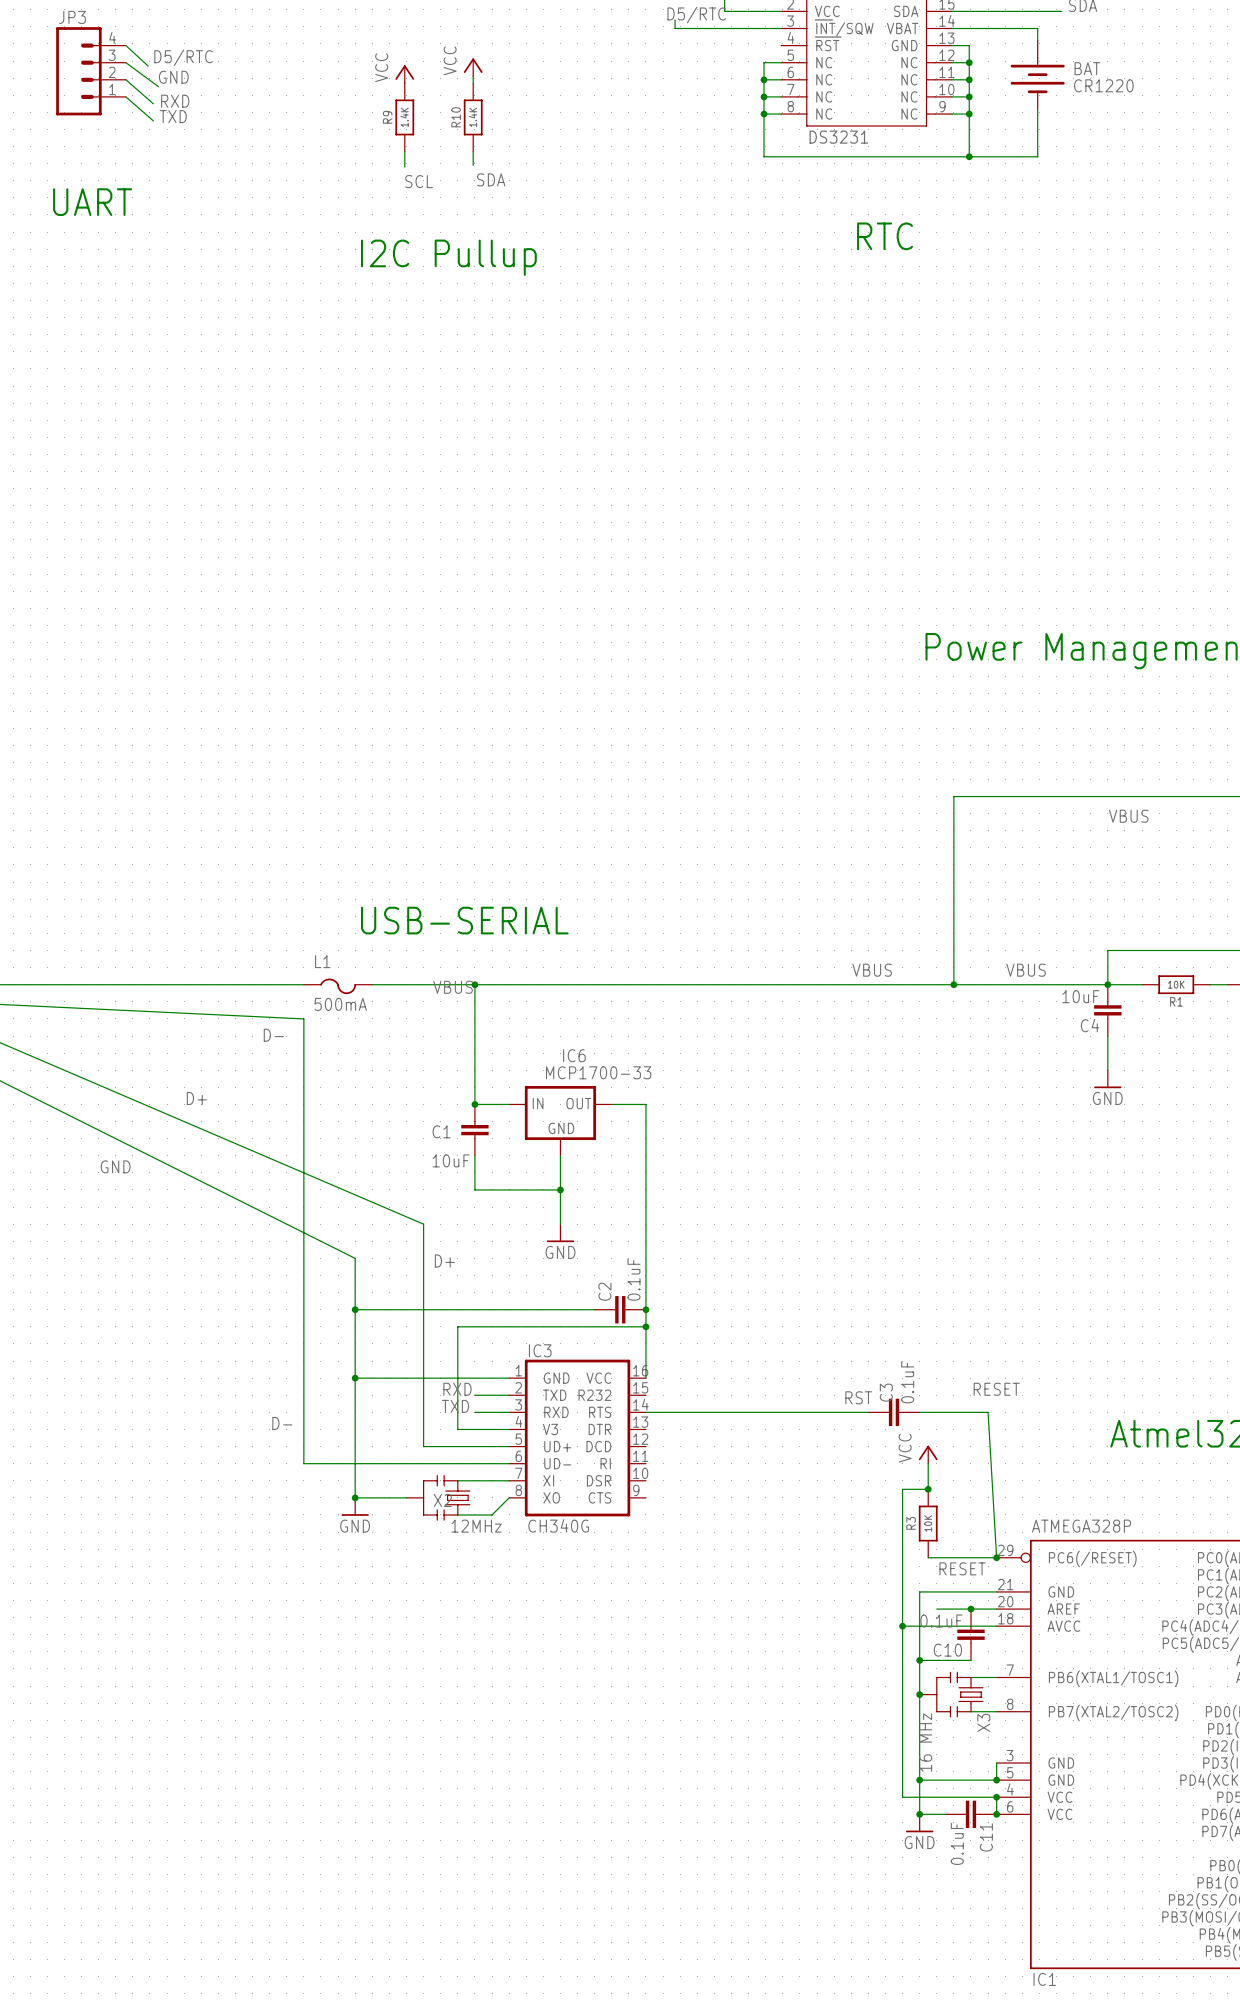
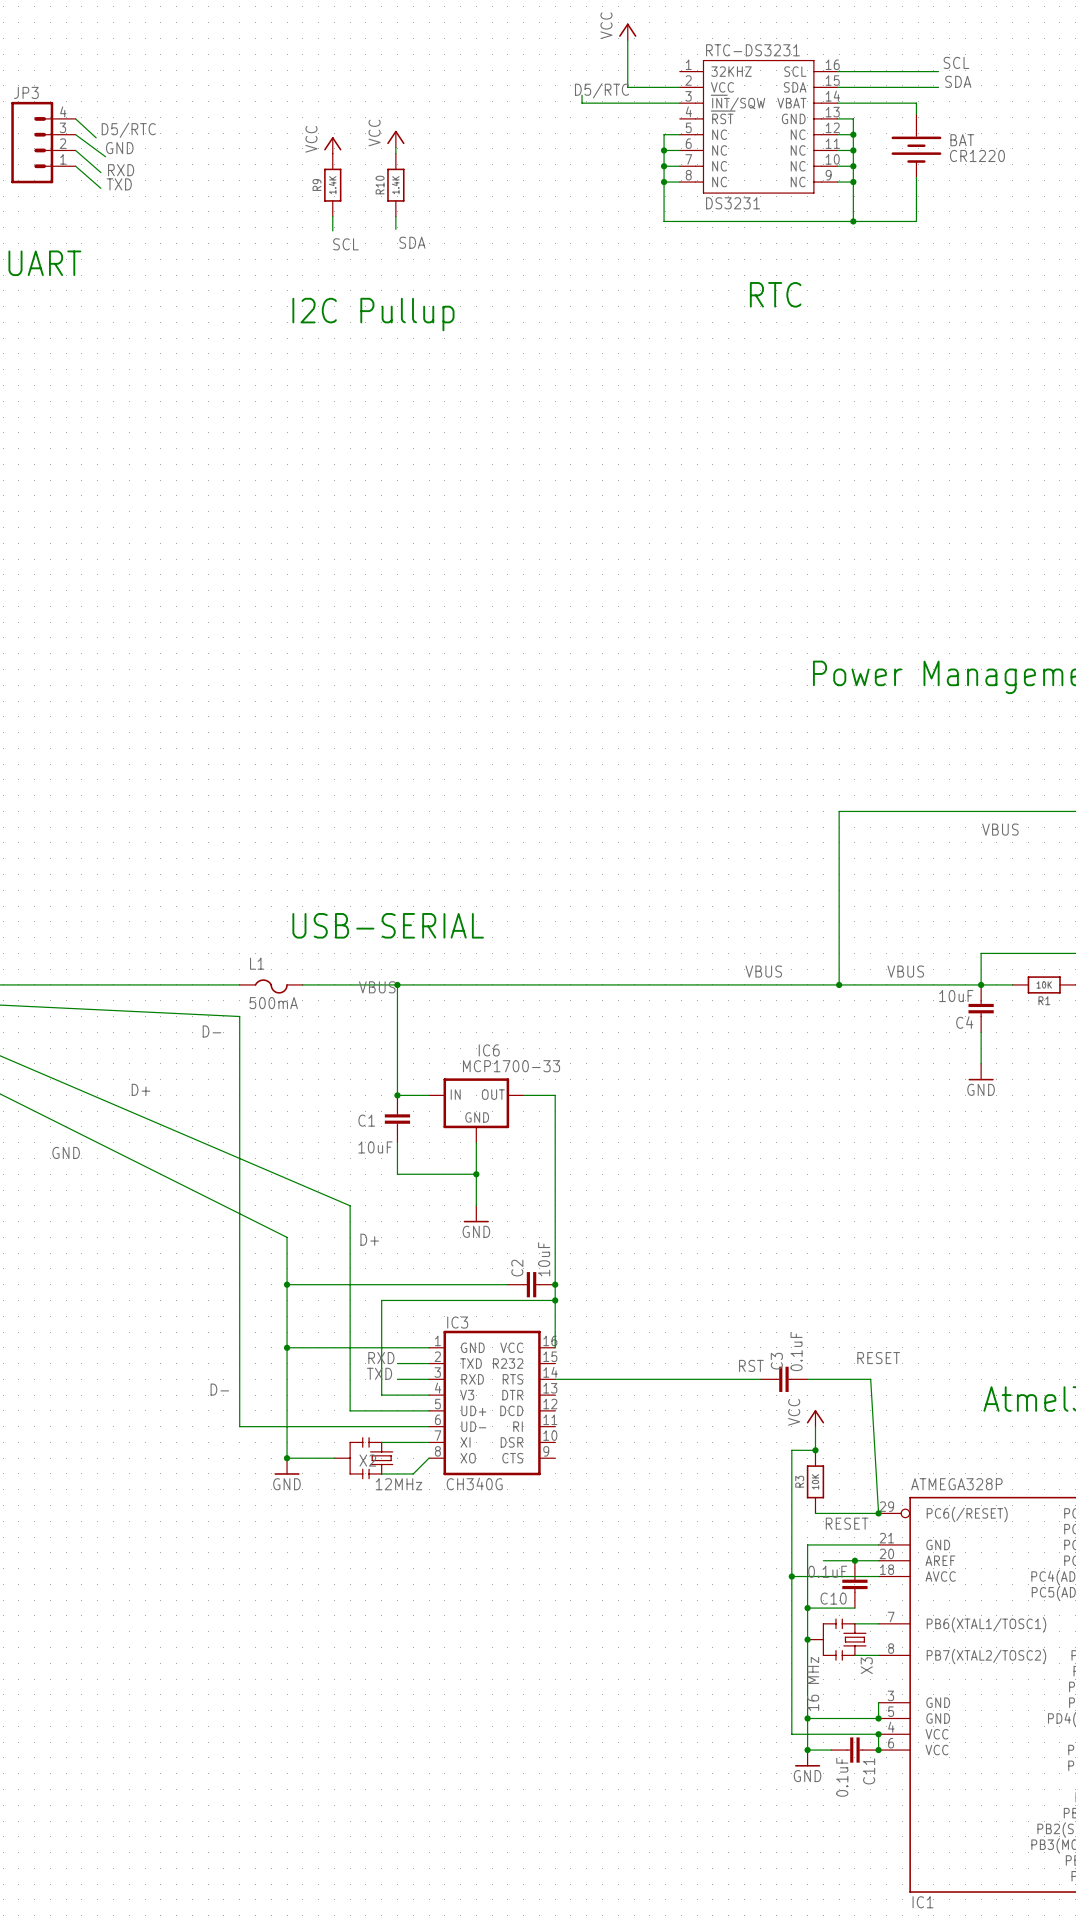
C2 value: 0.1uF (634, 1279) -> 10uF (544, 1259)

